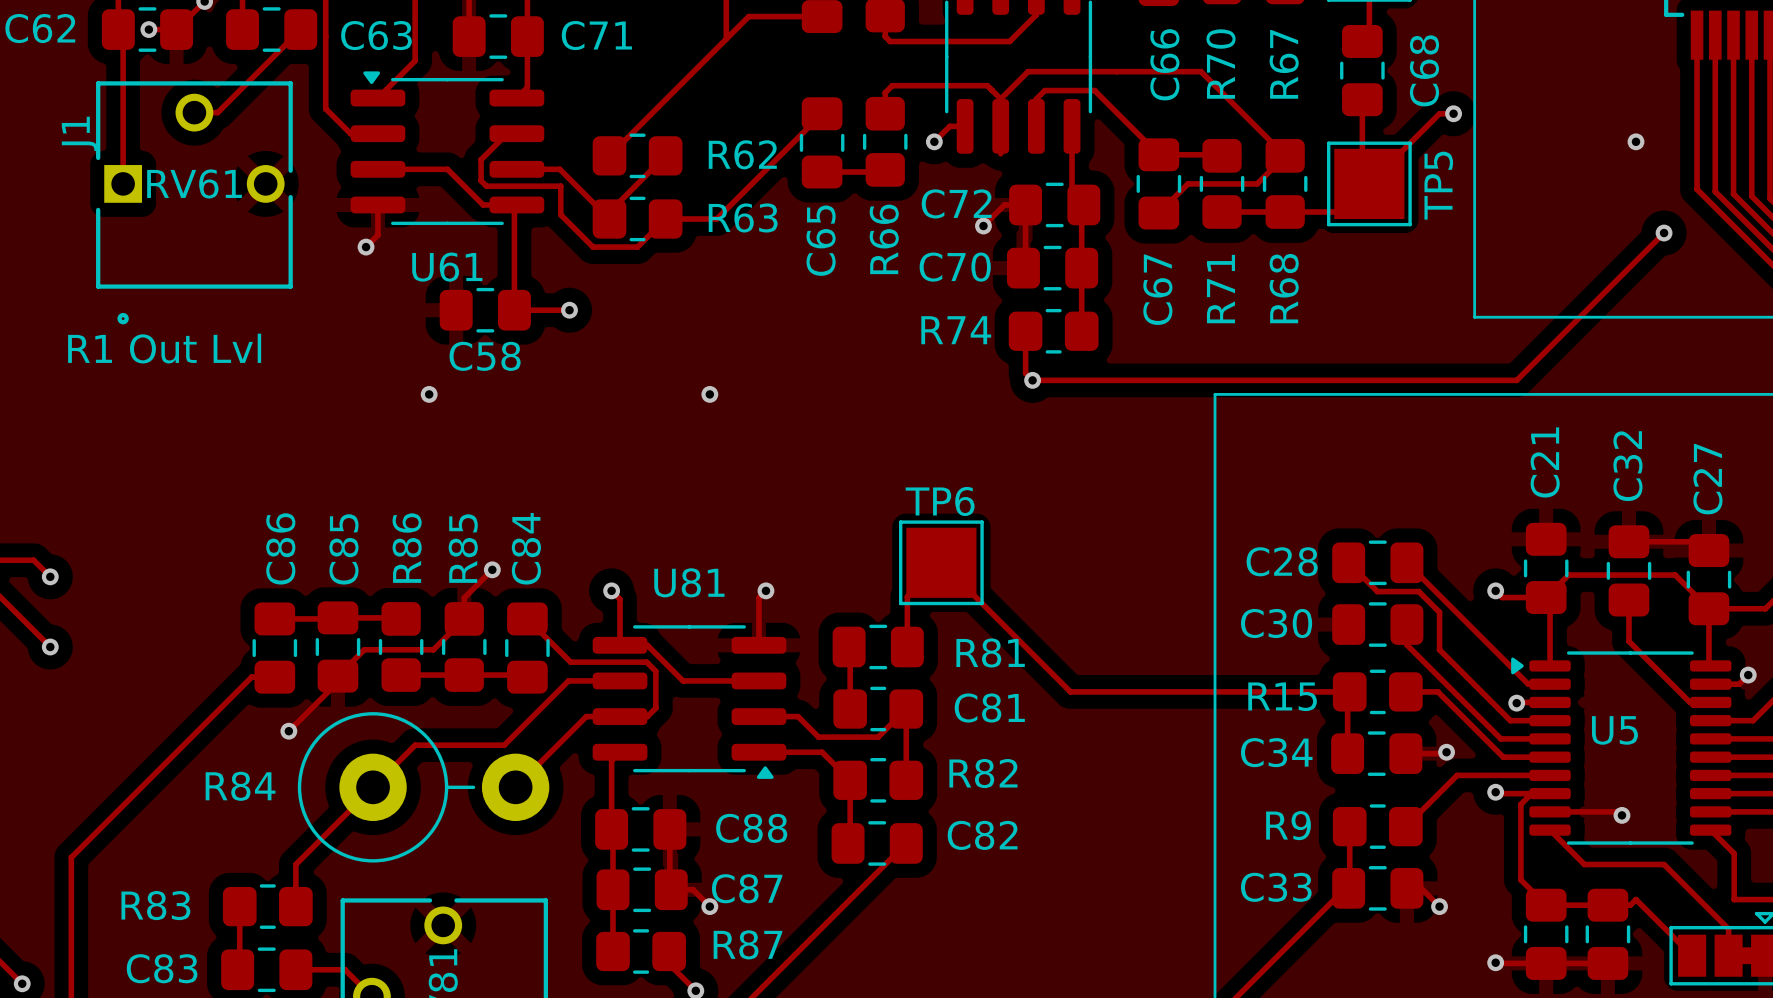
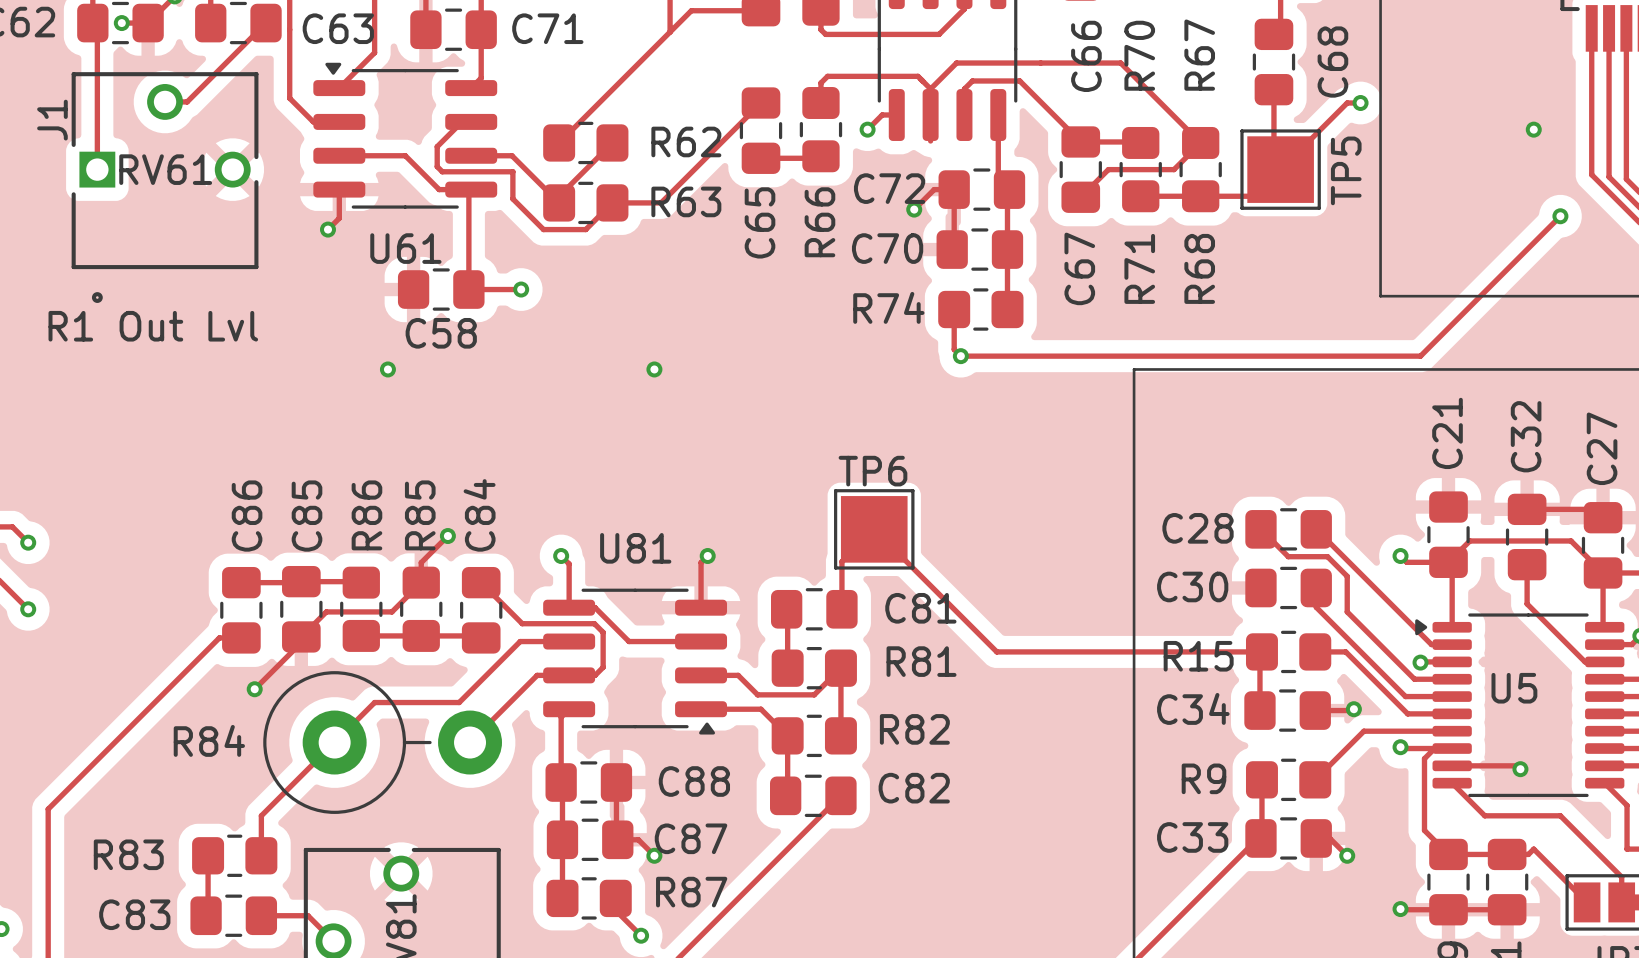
R81 name position: R81 (990, 652) -> R81 (921, 661)
C81 name position: C81 (989, 707) -> C81 (920, 608)

